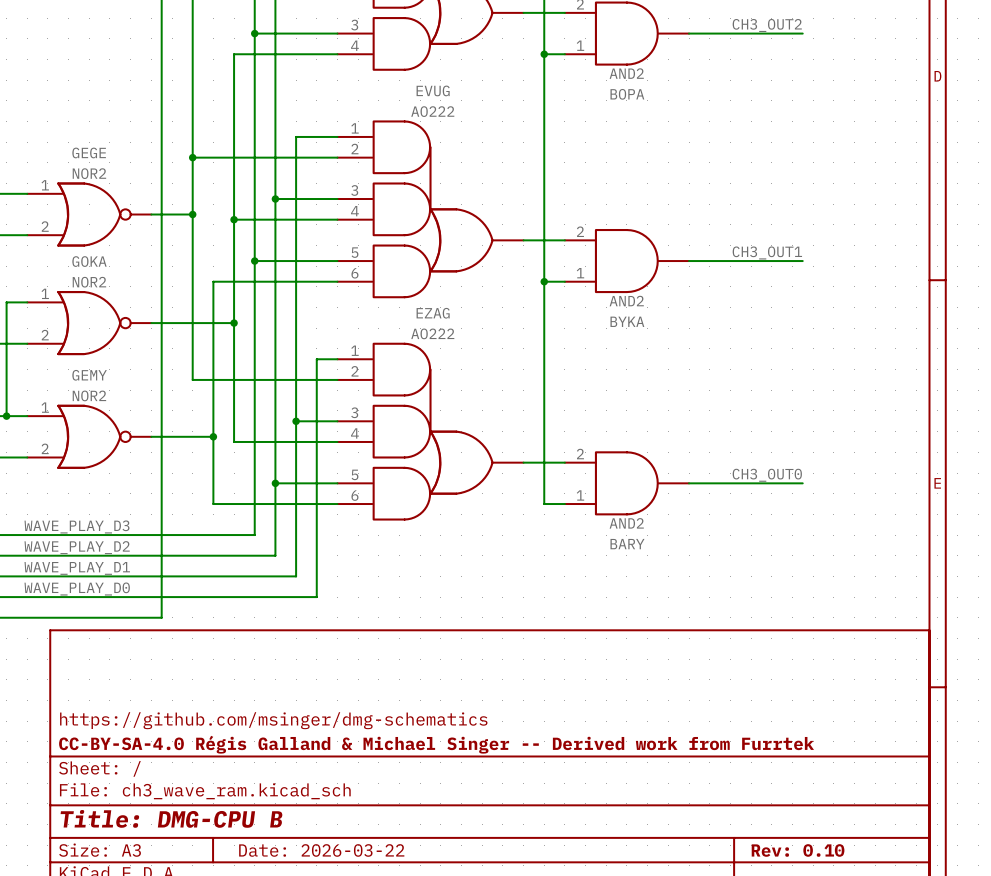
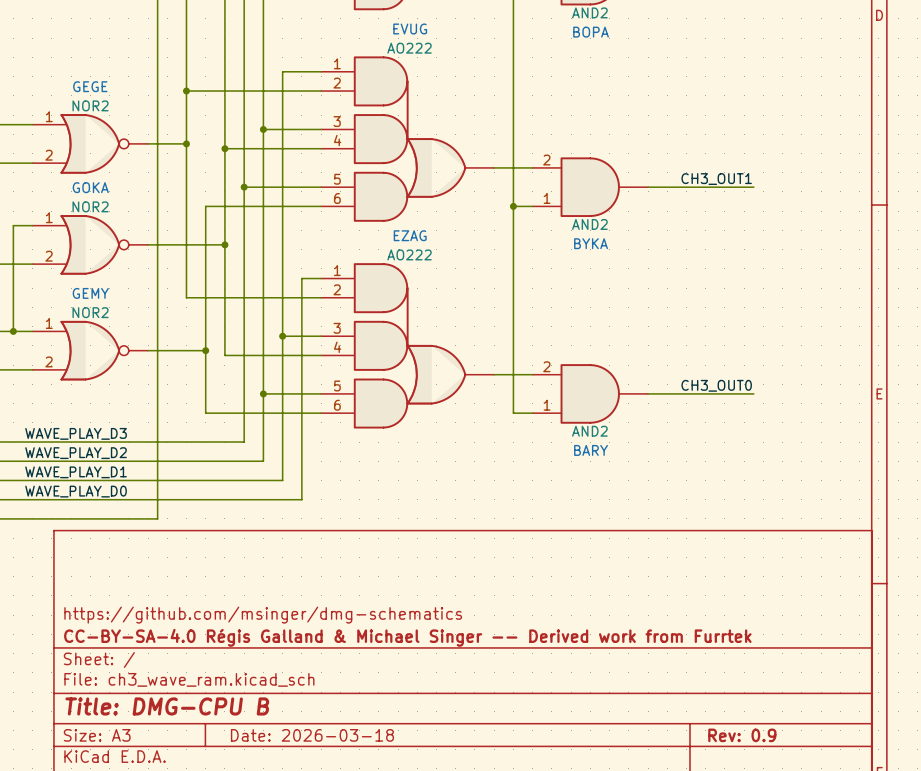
title block: Date: 2026-03-22 (321, 850) -> Date: 2026-03-18 (312, 735)
title block: Rev: 0.10 (798, 850) -> Rev: 0.9 (742, 735)

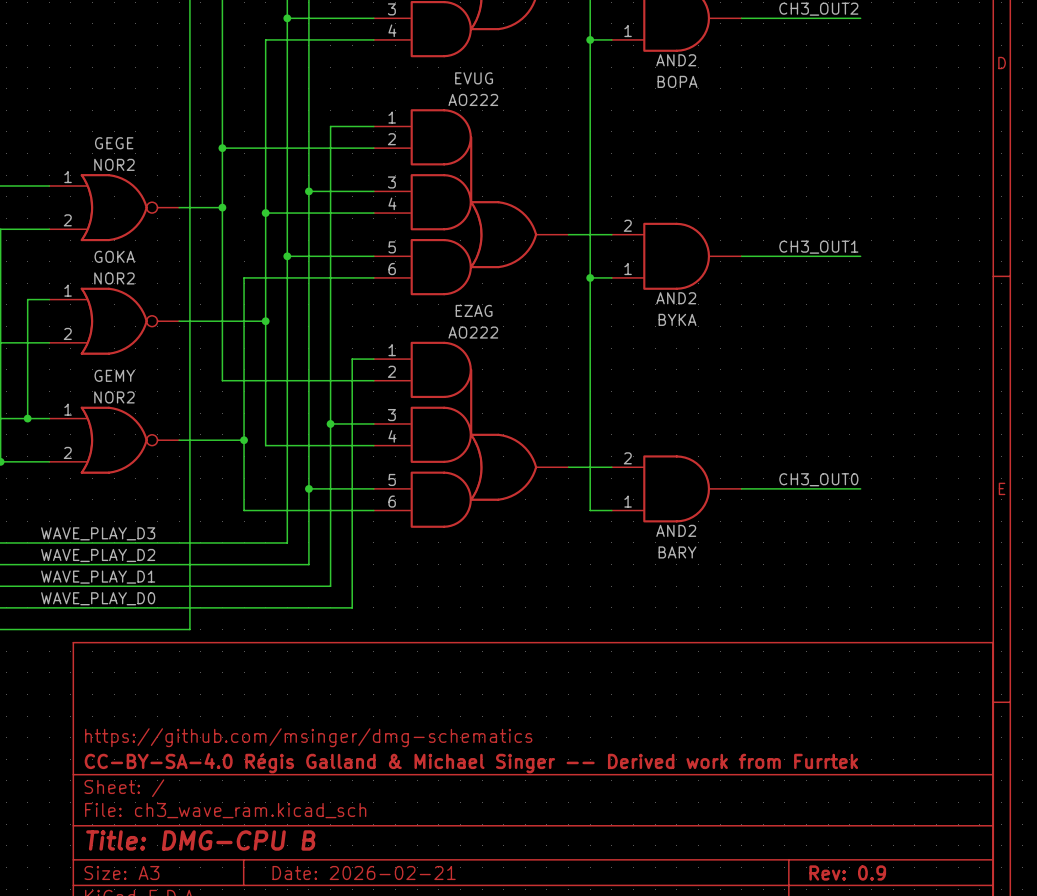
title block: Date: 2026-03-18 (312, 735) -> Date: 2026-02-21 (364, 873)

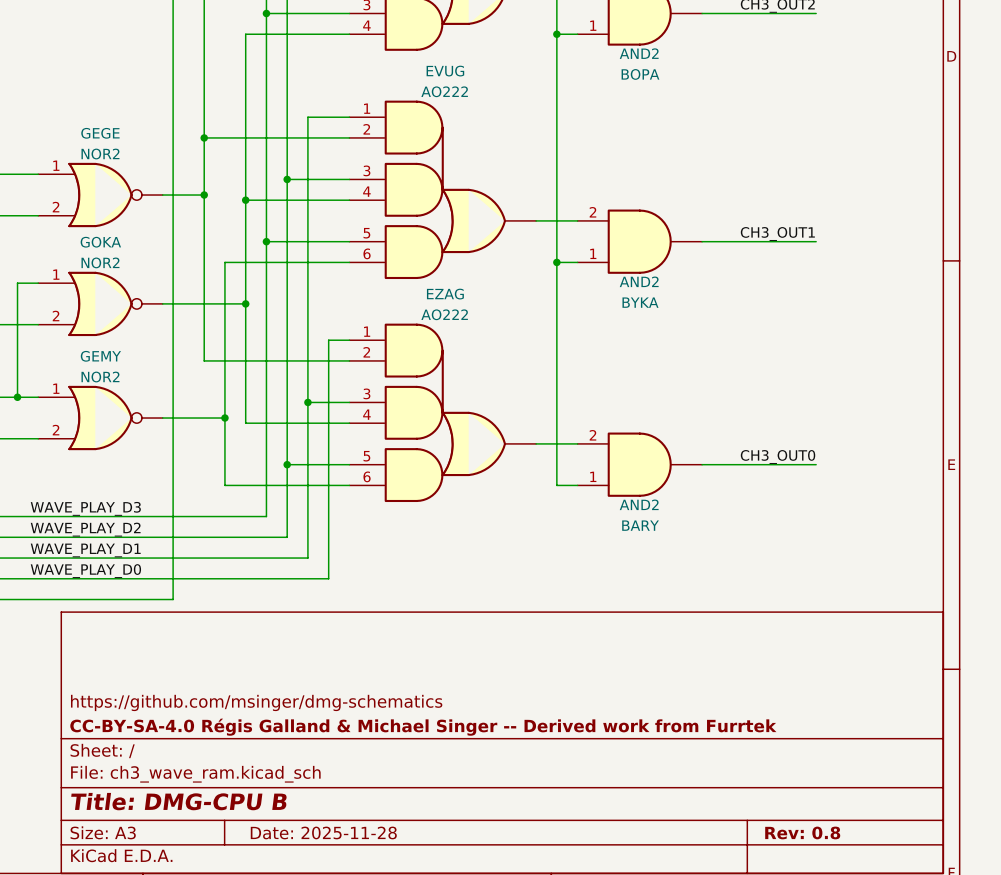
title block: Date: 2026-02-21 (364, 873) -> Date: 2025-11-28 (323, 832)
title block: Rev: 0.9 (847, 873) -> Rev: 0.8 (802, 832)

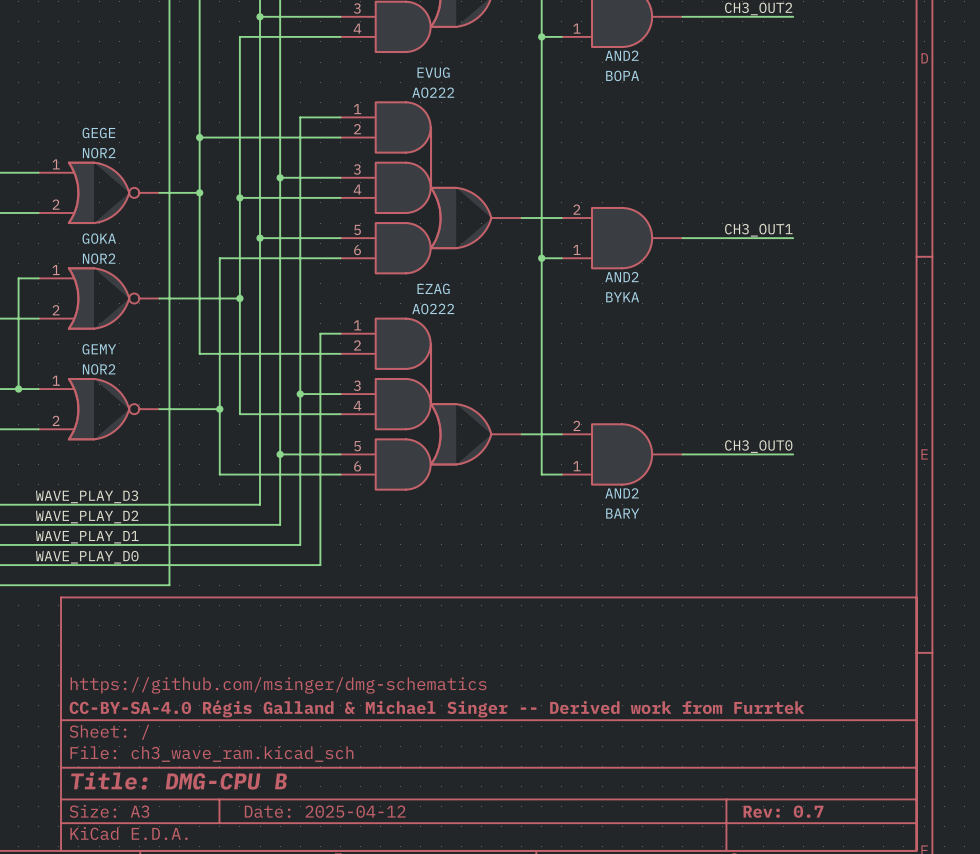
title block: Date: 2025-11-28 (323, 832) -> Date: 2025-04-12 (325, 811)
title block: Rev: 0.8 (802, 832) -> Rev: 0.7 (783, 811)

